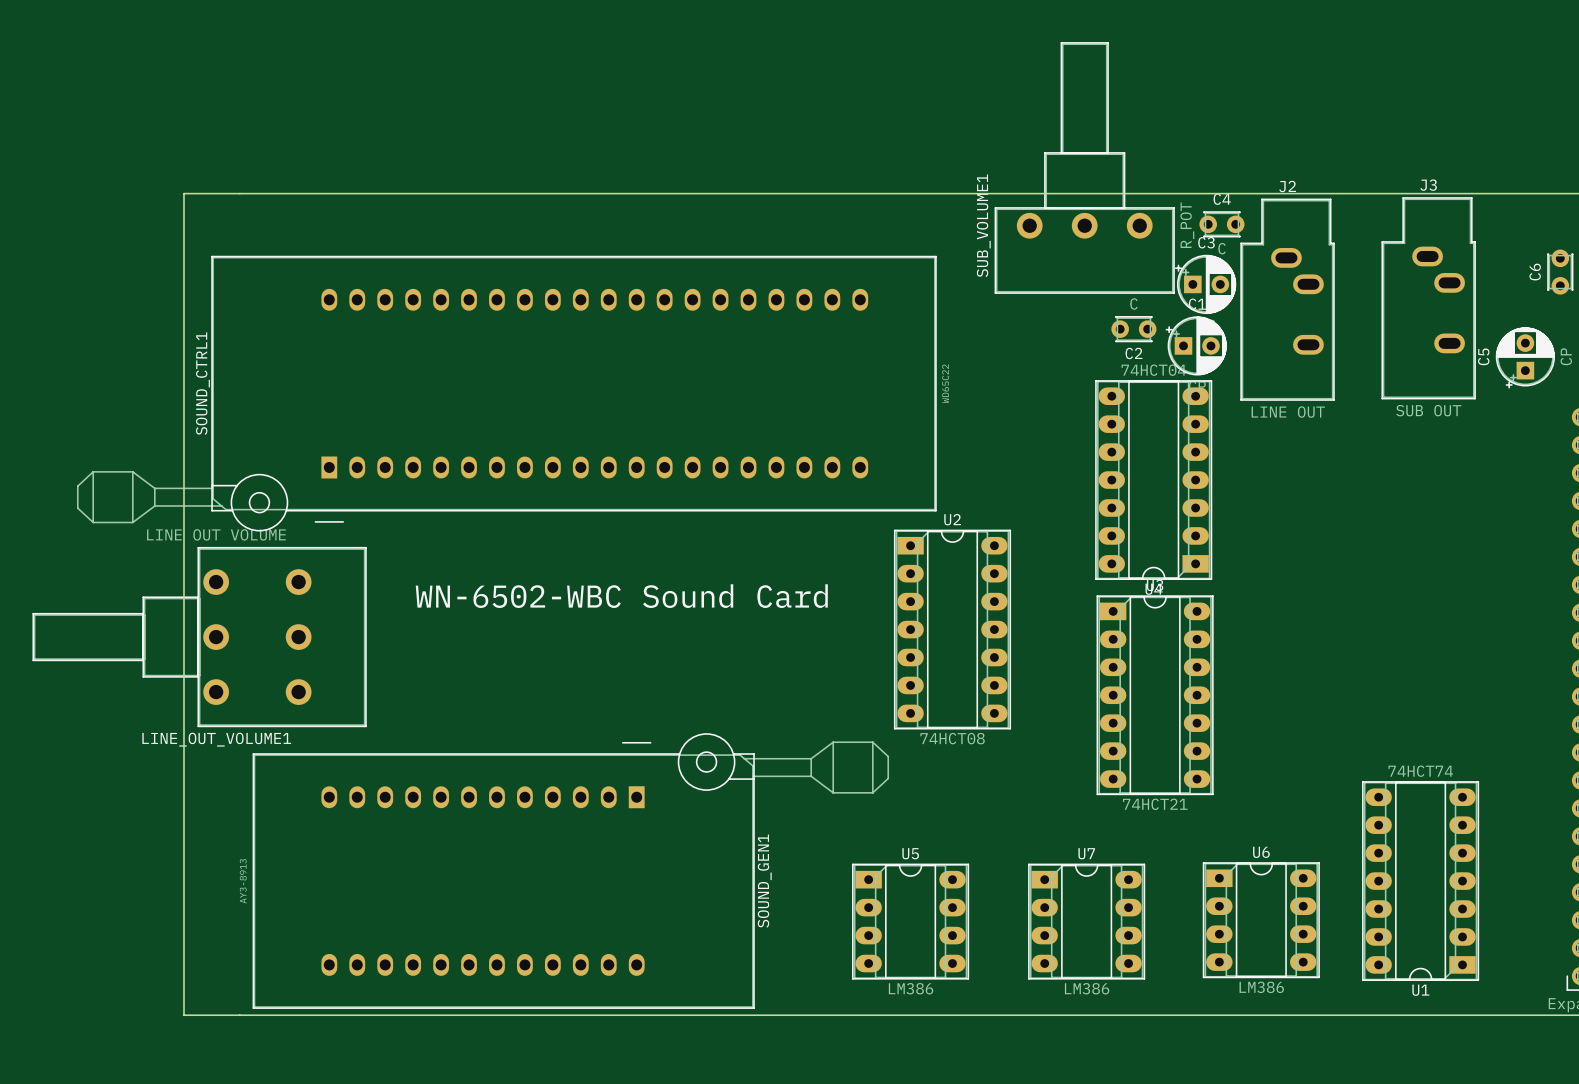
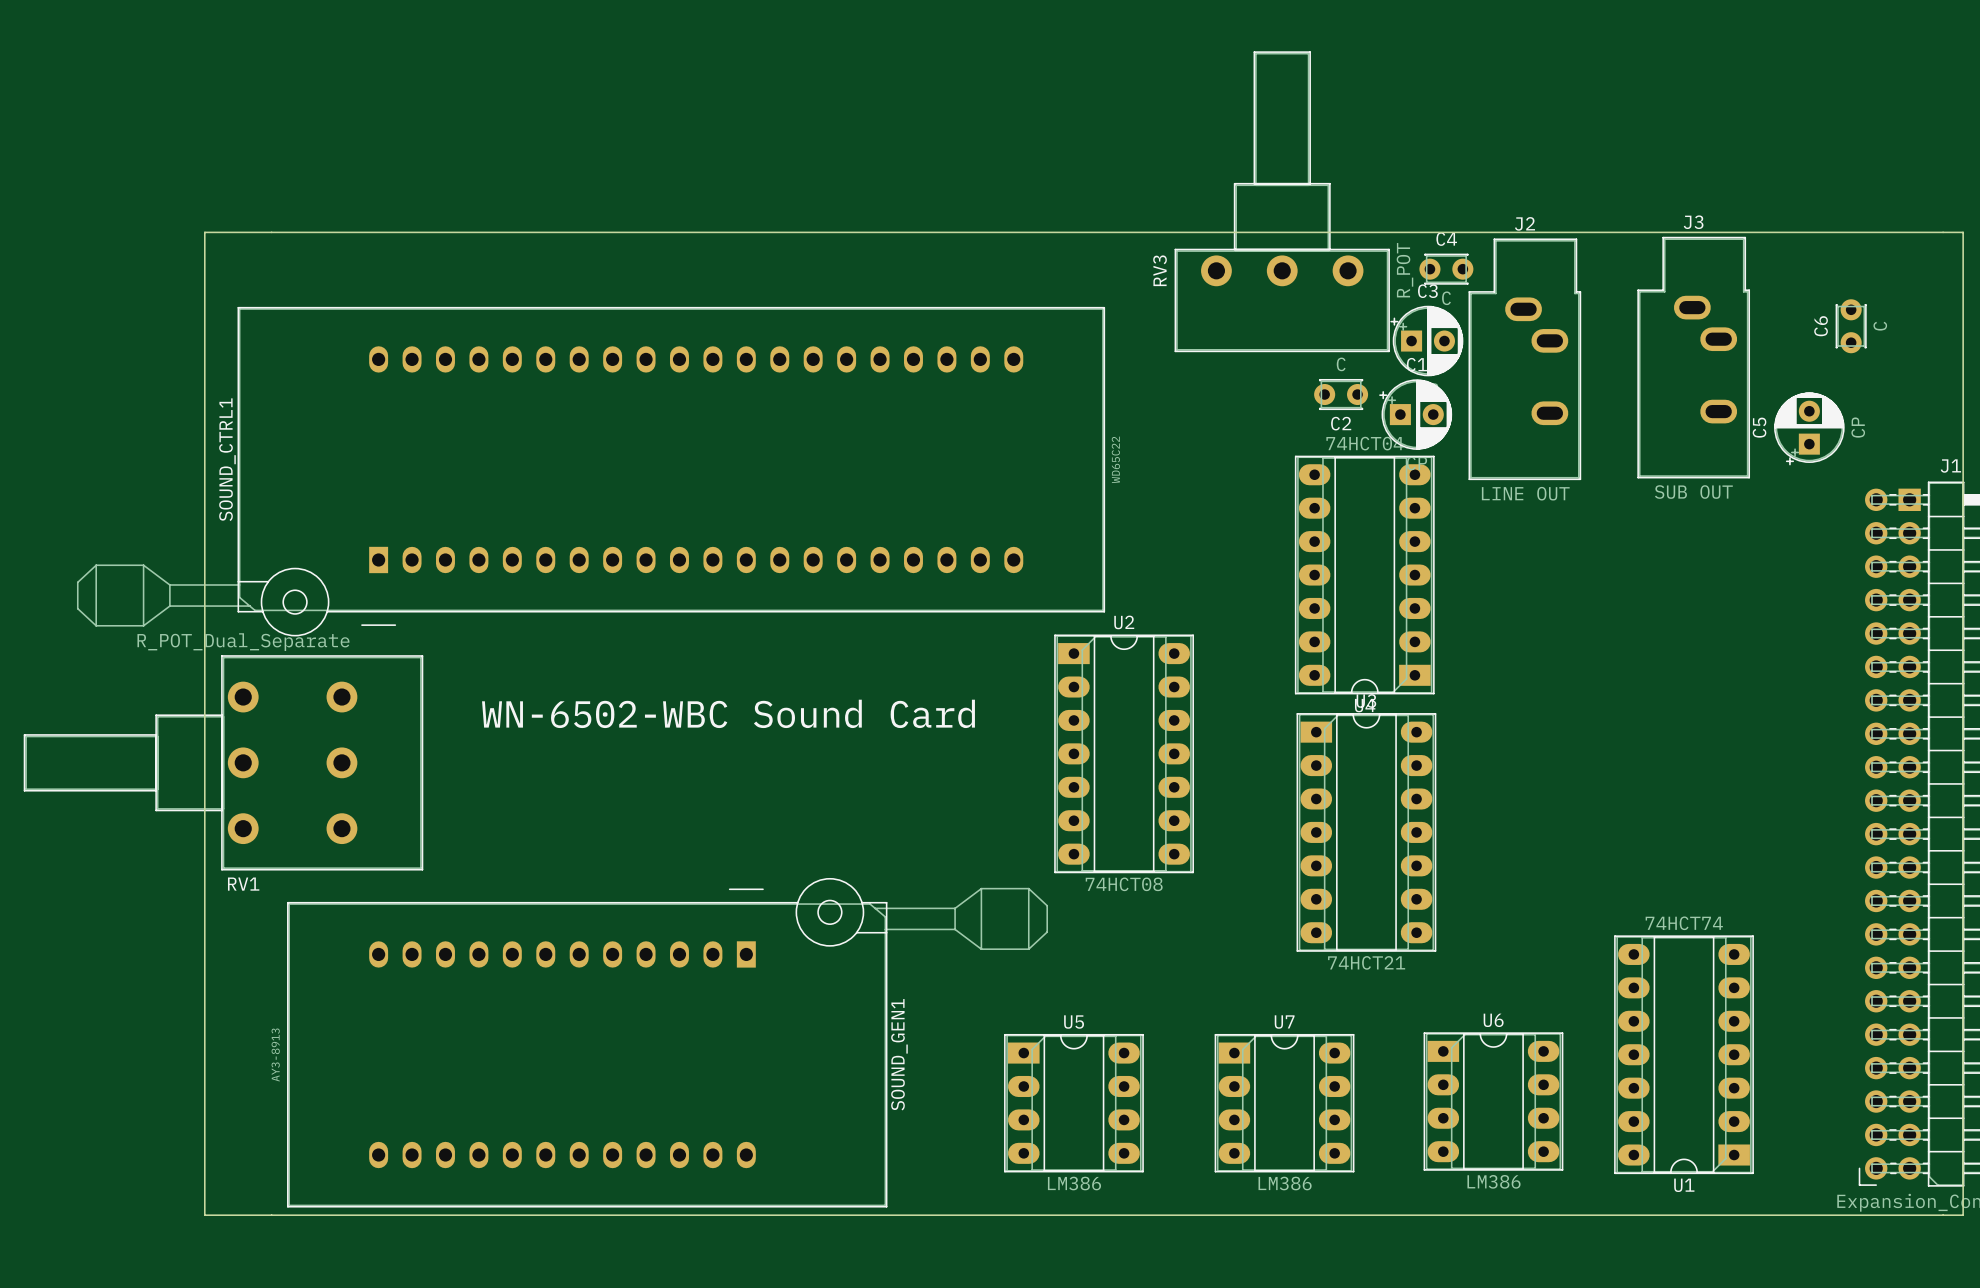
SUB_VOLUME1 name: SUB_VOLUME1 (983, 225) -> RV3 (1160, 270)
LINE_OUT_VOLUME1 value: LINE OUT VOLUME (216, 534) -> R_POT_Dual_Separate (243, 642)
LINE_OUT_VOLUME1 name: LINE_OUT_VOLUME1 (216, 739) -> RV1 (243, 884)

